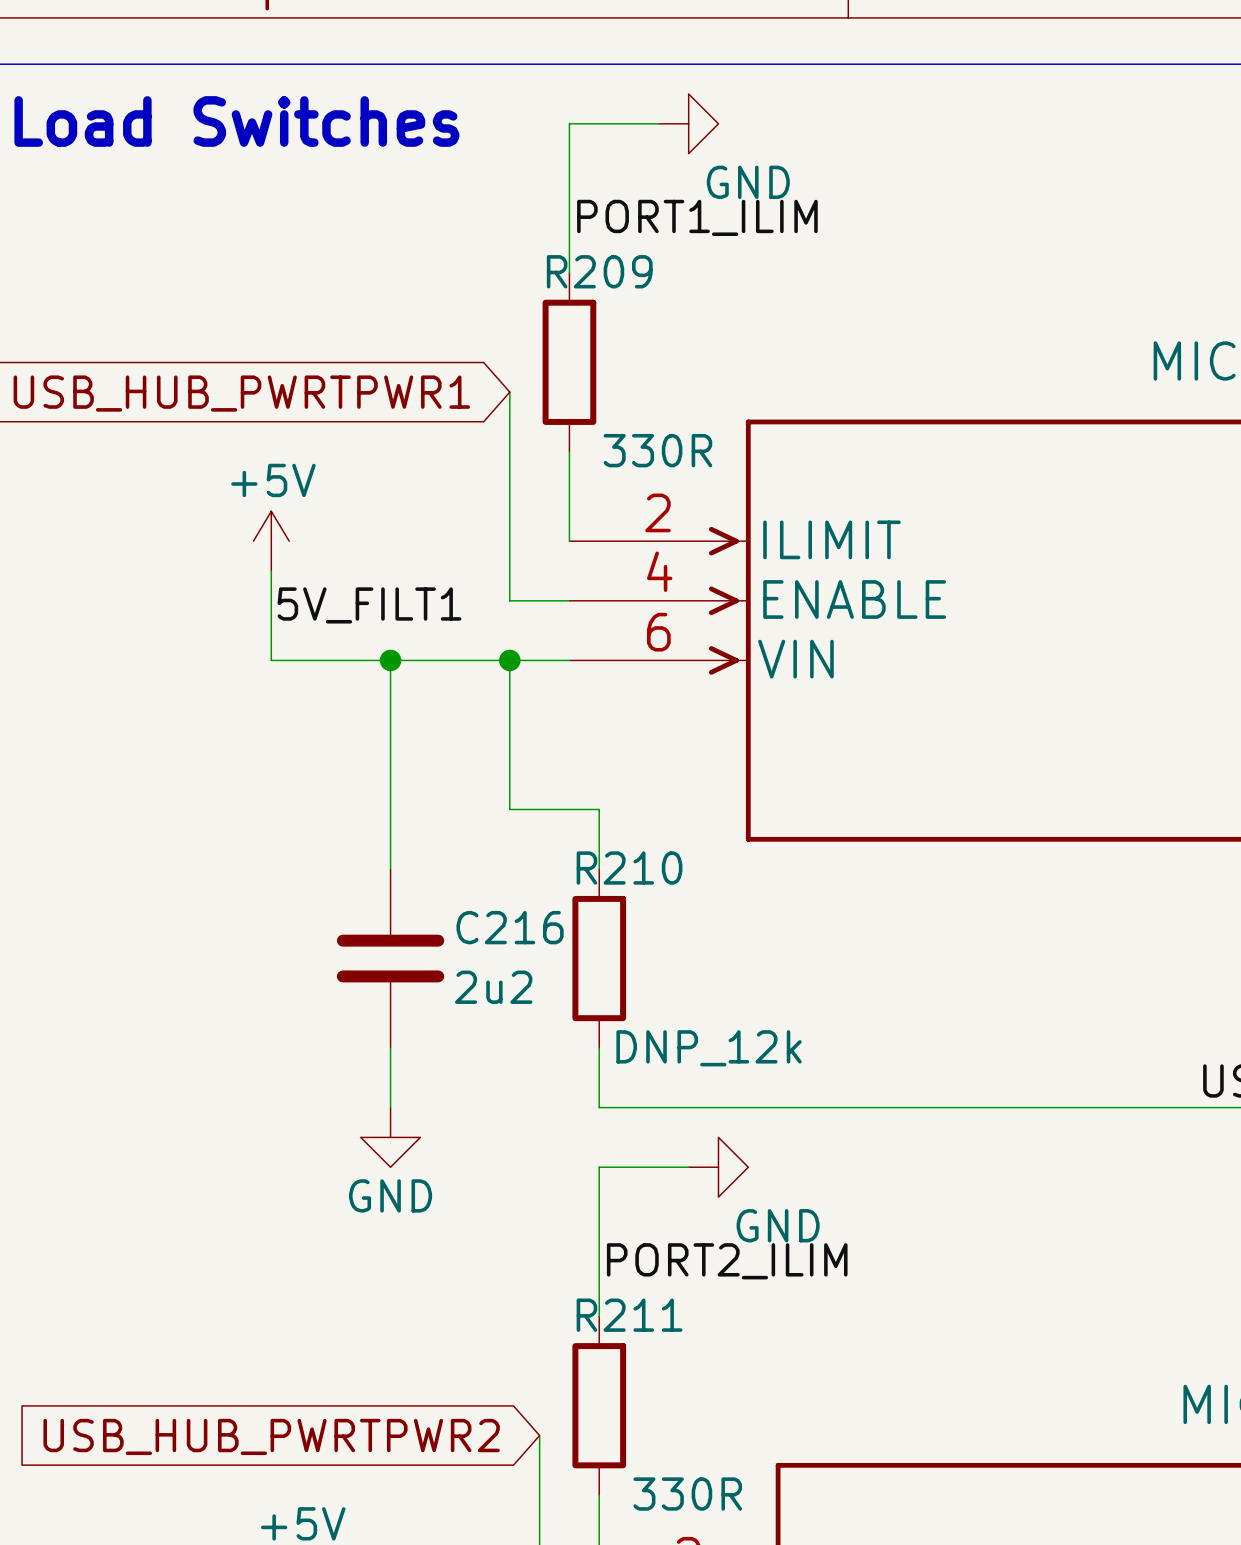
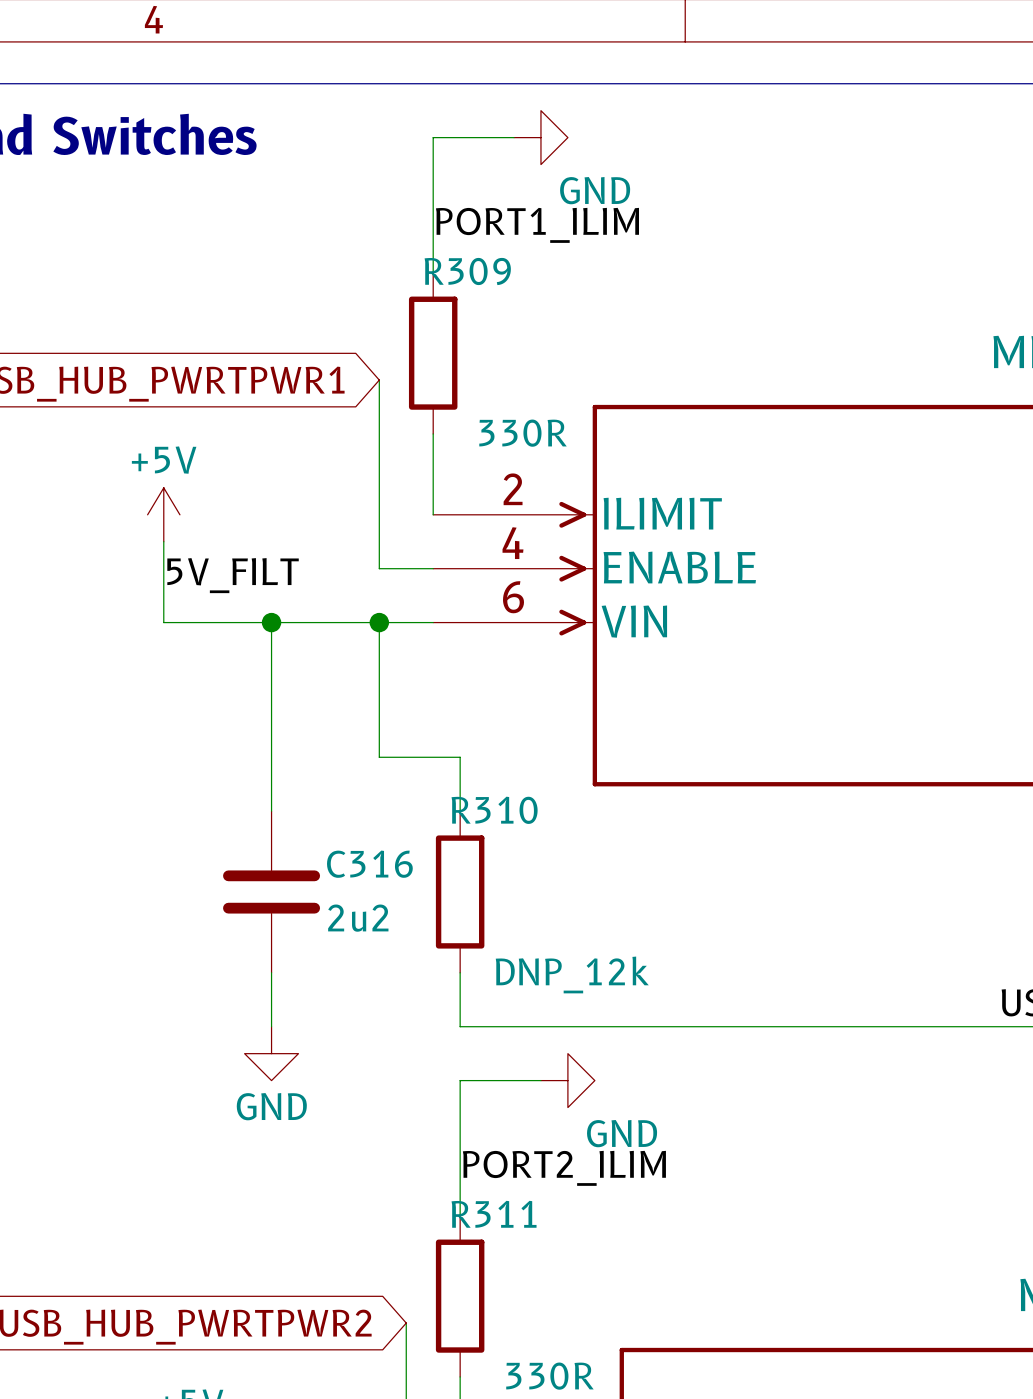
R209 name: R209 (599, 271) -> R309 (467, 271)
label: 5V_FILT1 (369, 605) -> 5V_FILT (233, 575)
R210 name: R210 (629, 868) -> R310 (494, 810)
C216 name: C216 (510, 927) -> C316 (369, 864)
R211 name: R211 (629, 1315) -> R311 (494, 1214)

